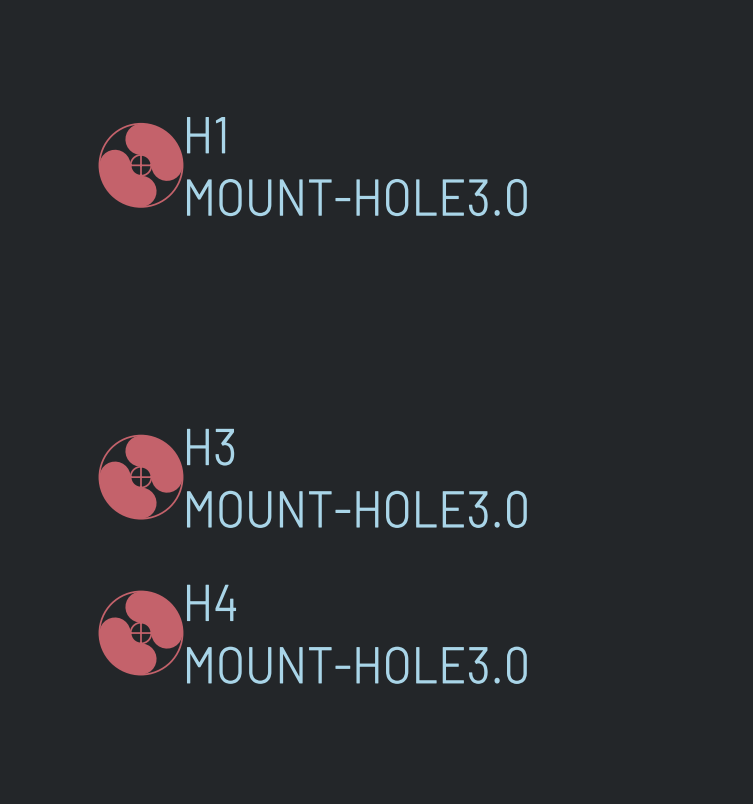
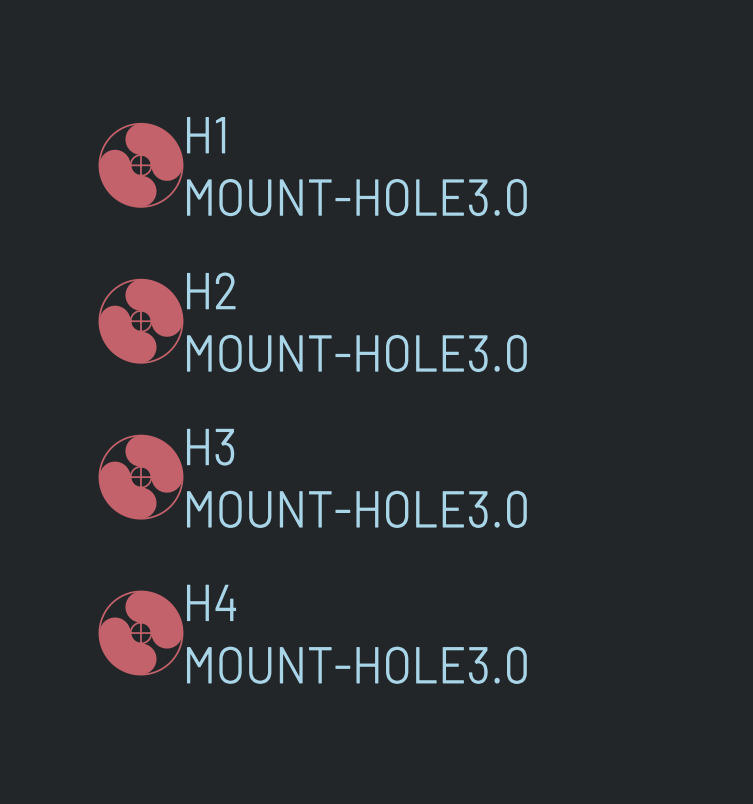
H2: none -> MOUNT-HOLE3.0 (140, 321)

